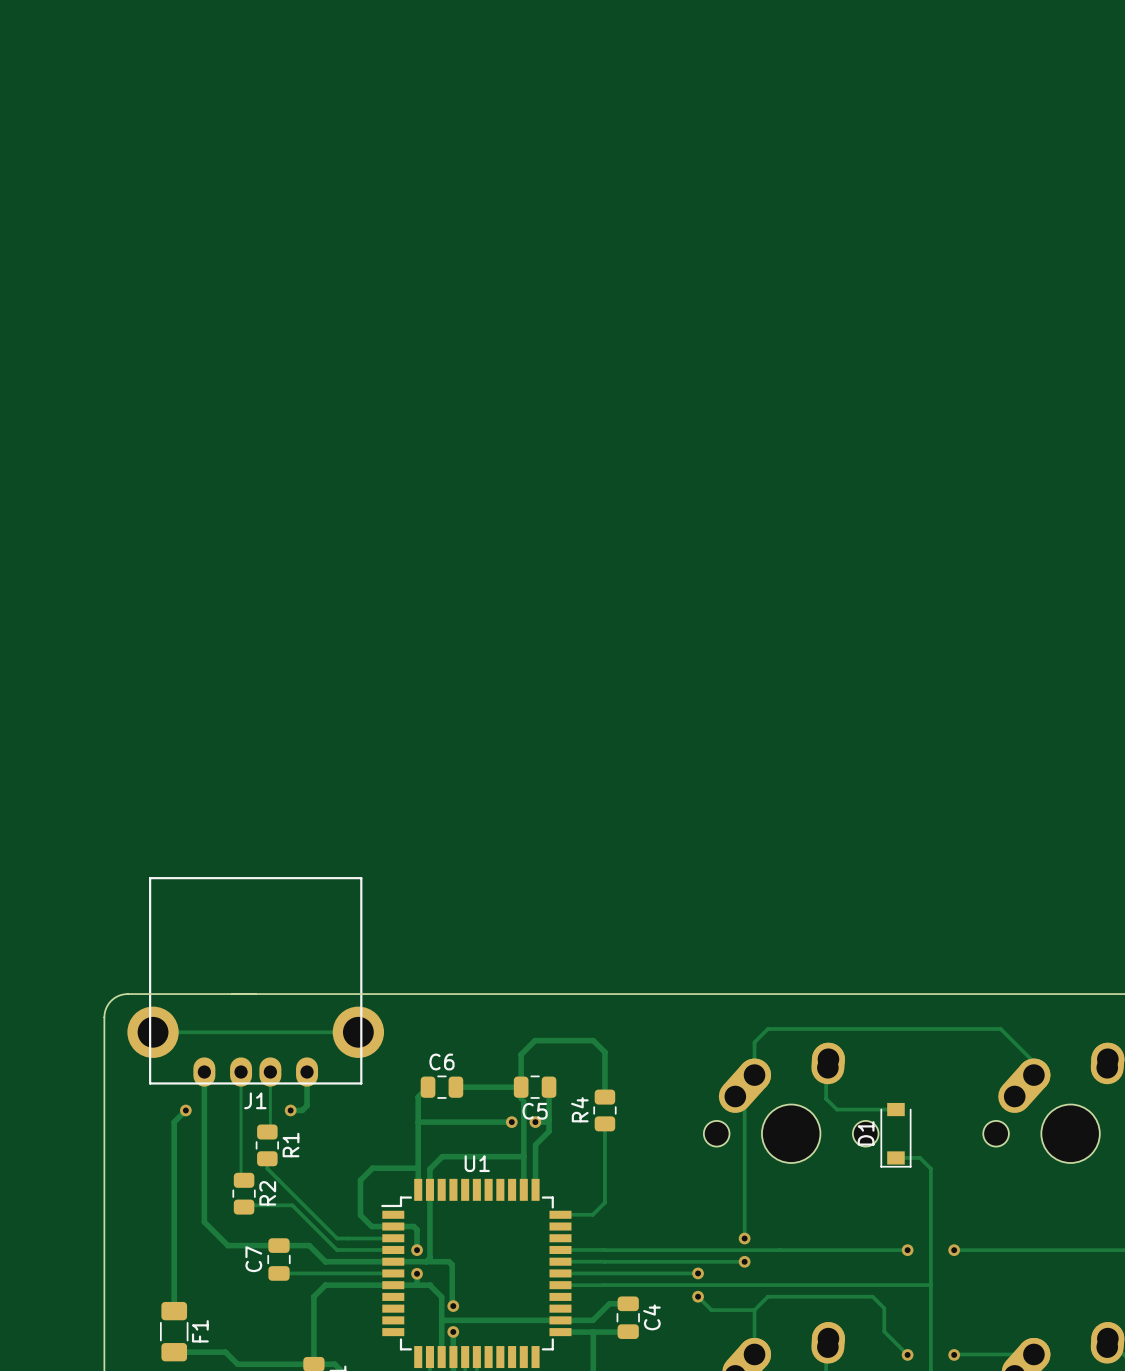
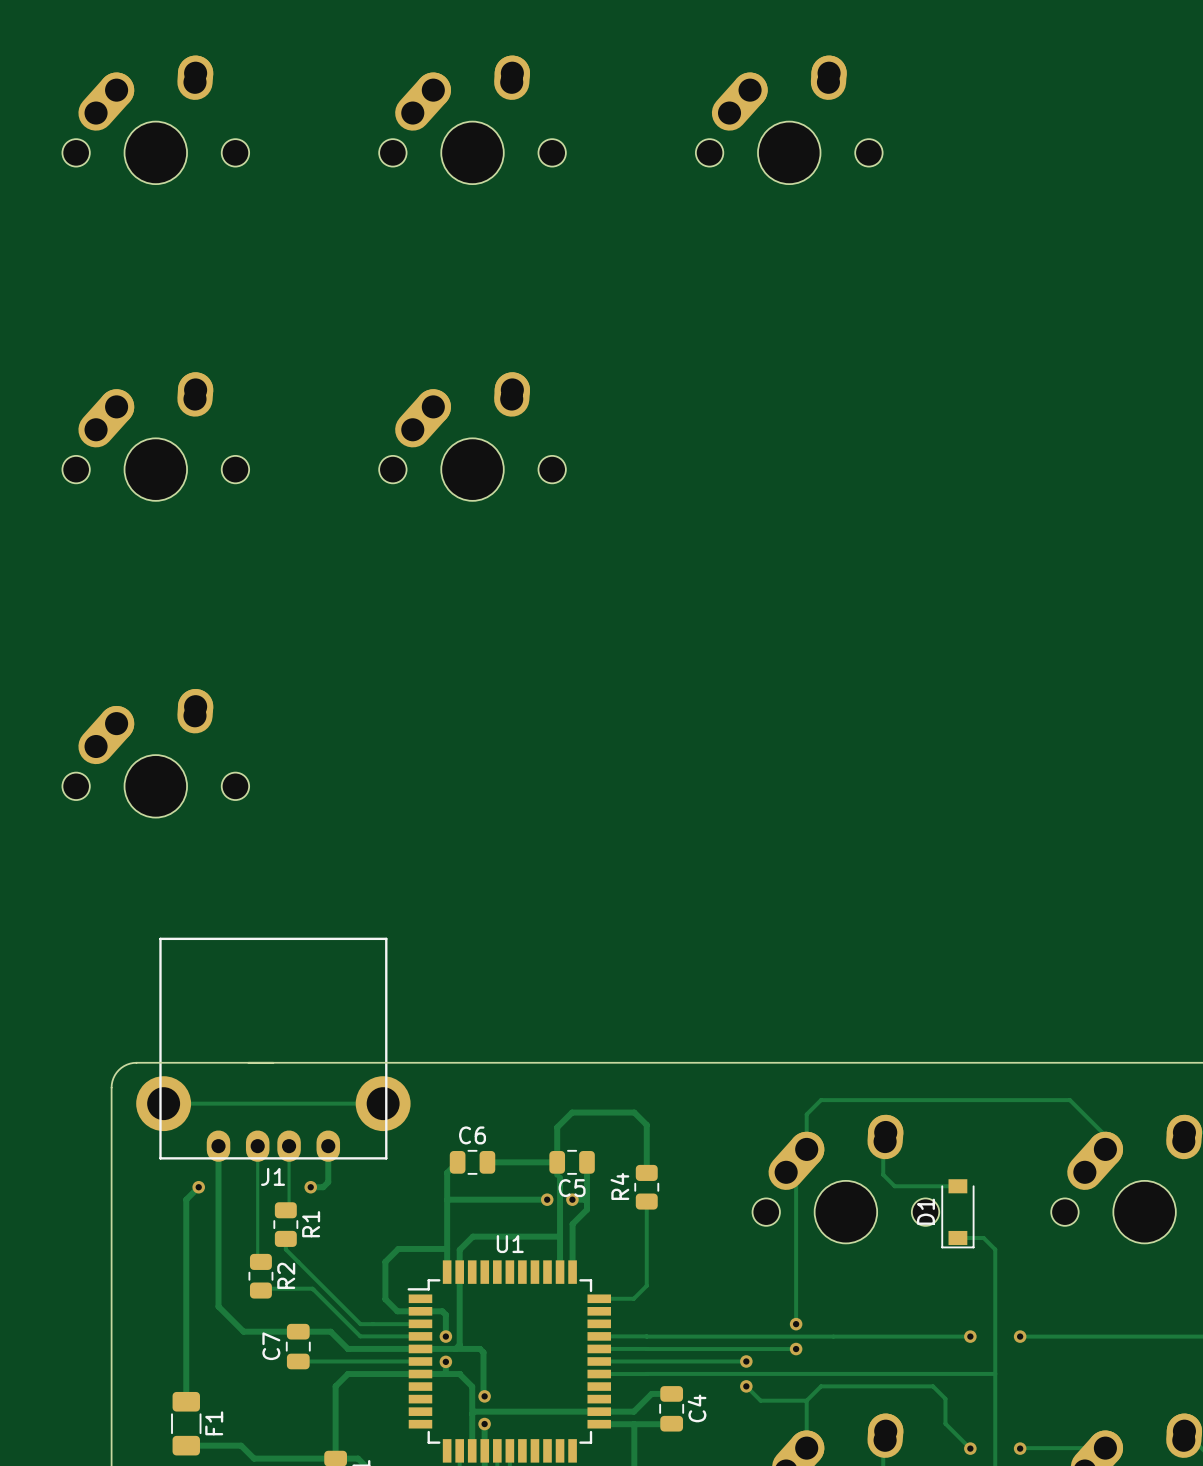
part: none -> (155, 119)
part: none -> (472, 119)
part: none -> (789, 119)
part: none -> (155, 436)
part: none -> (472, 436)
part: none -> (155, 753)

